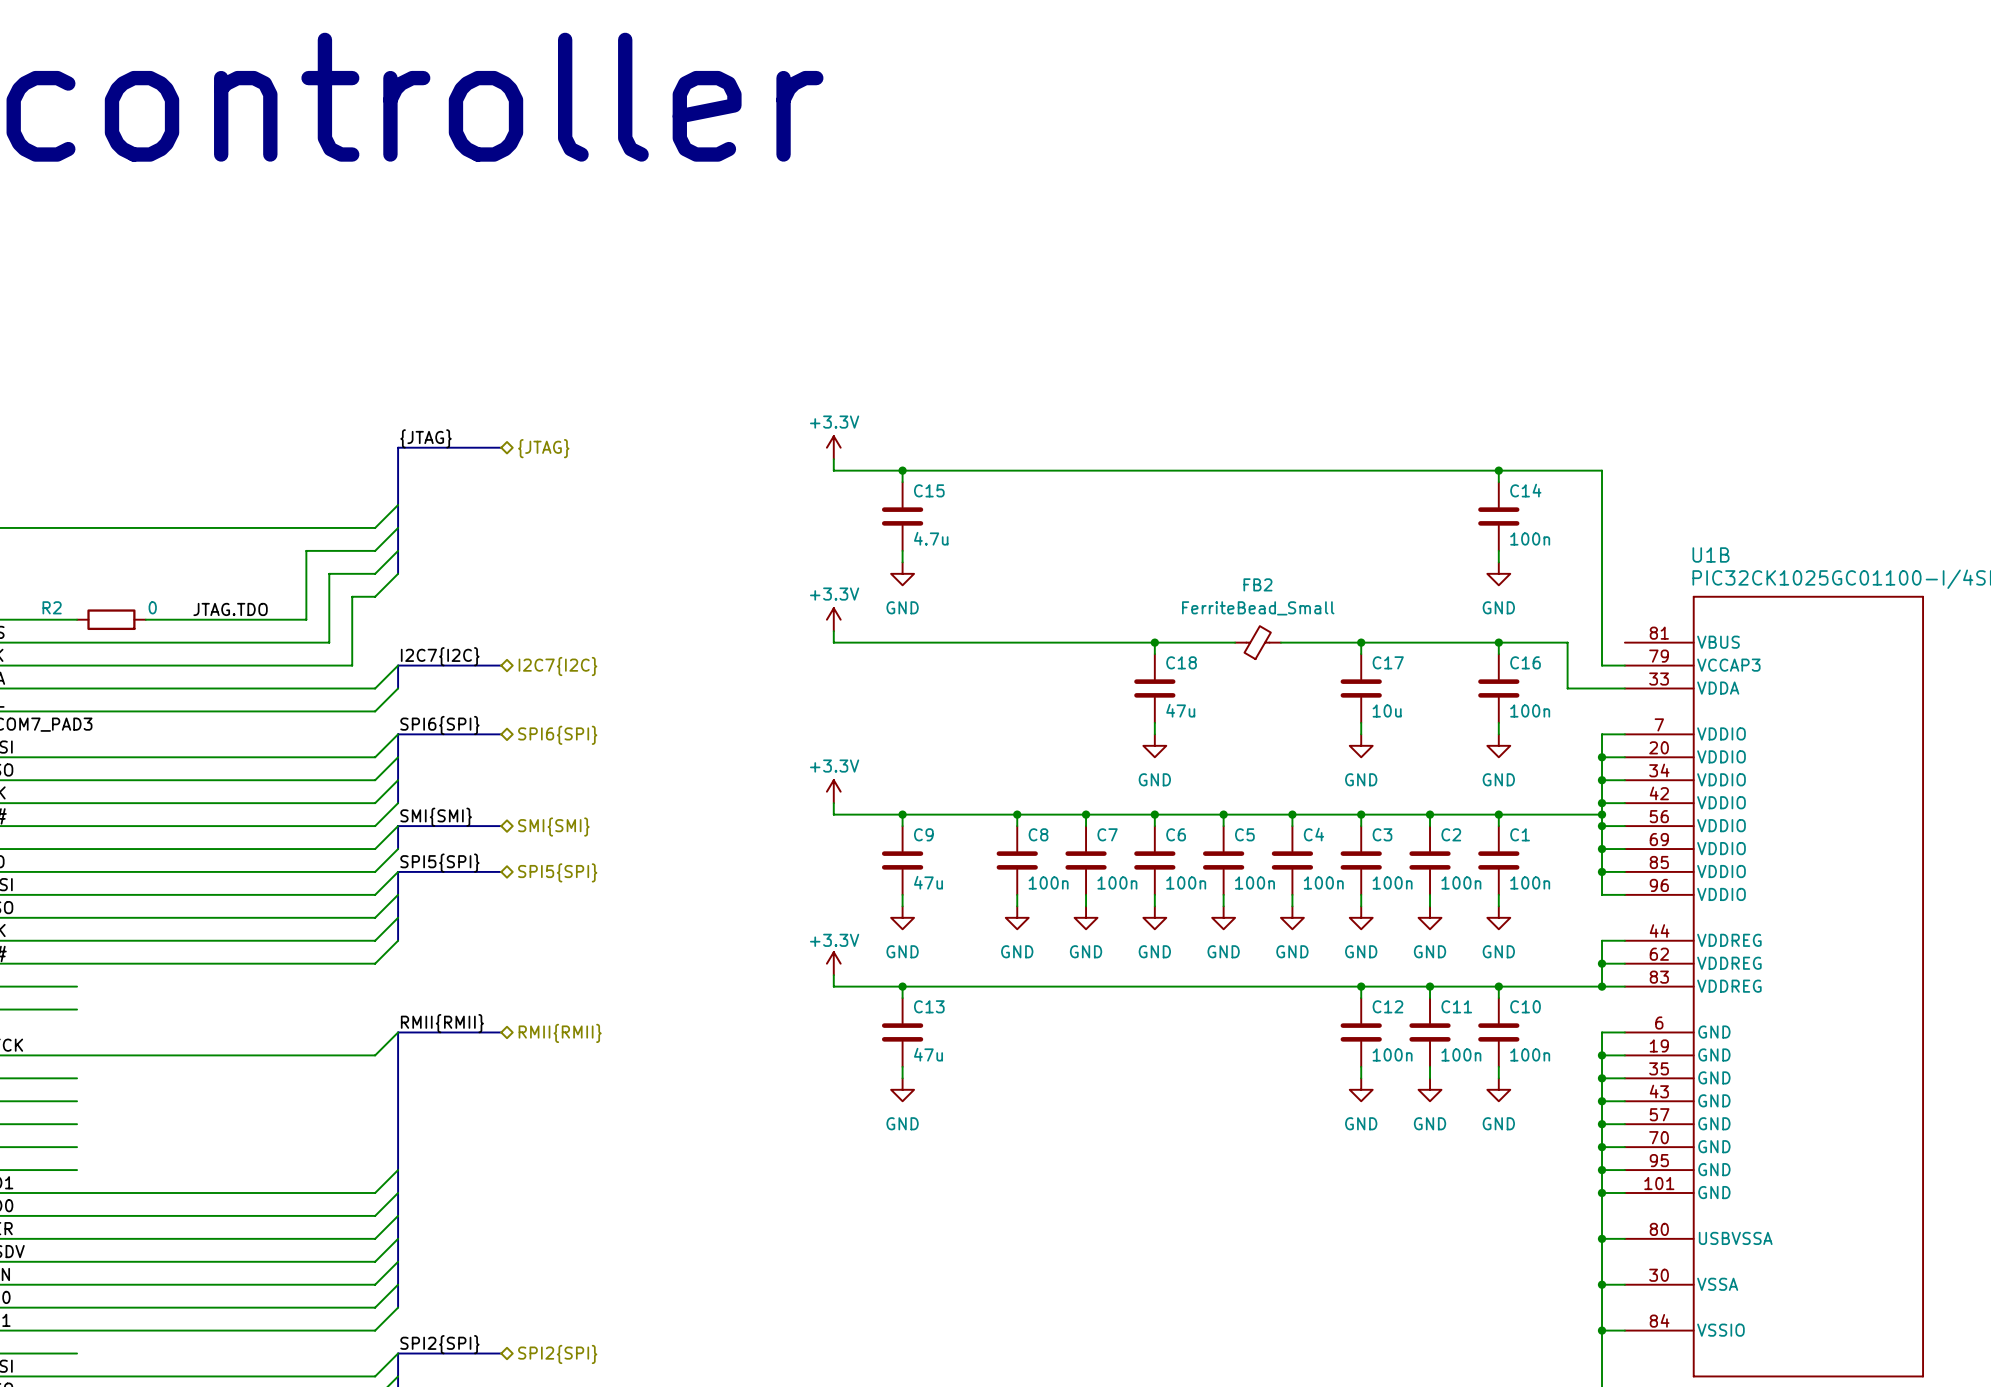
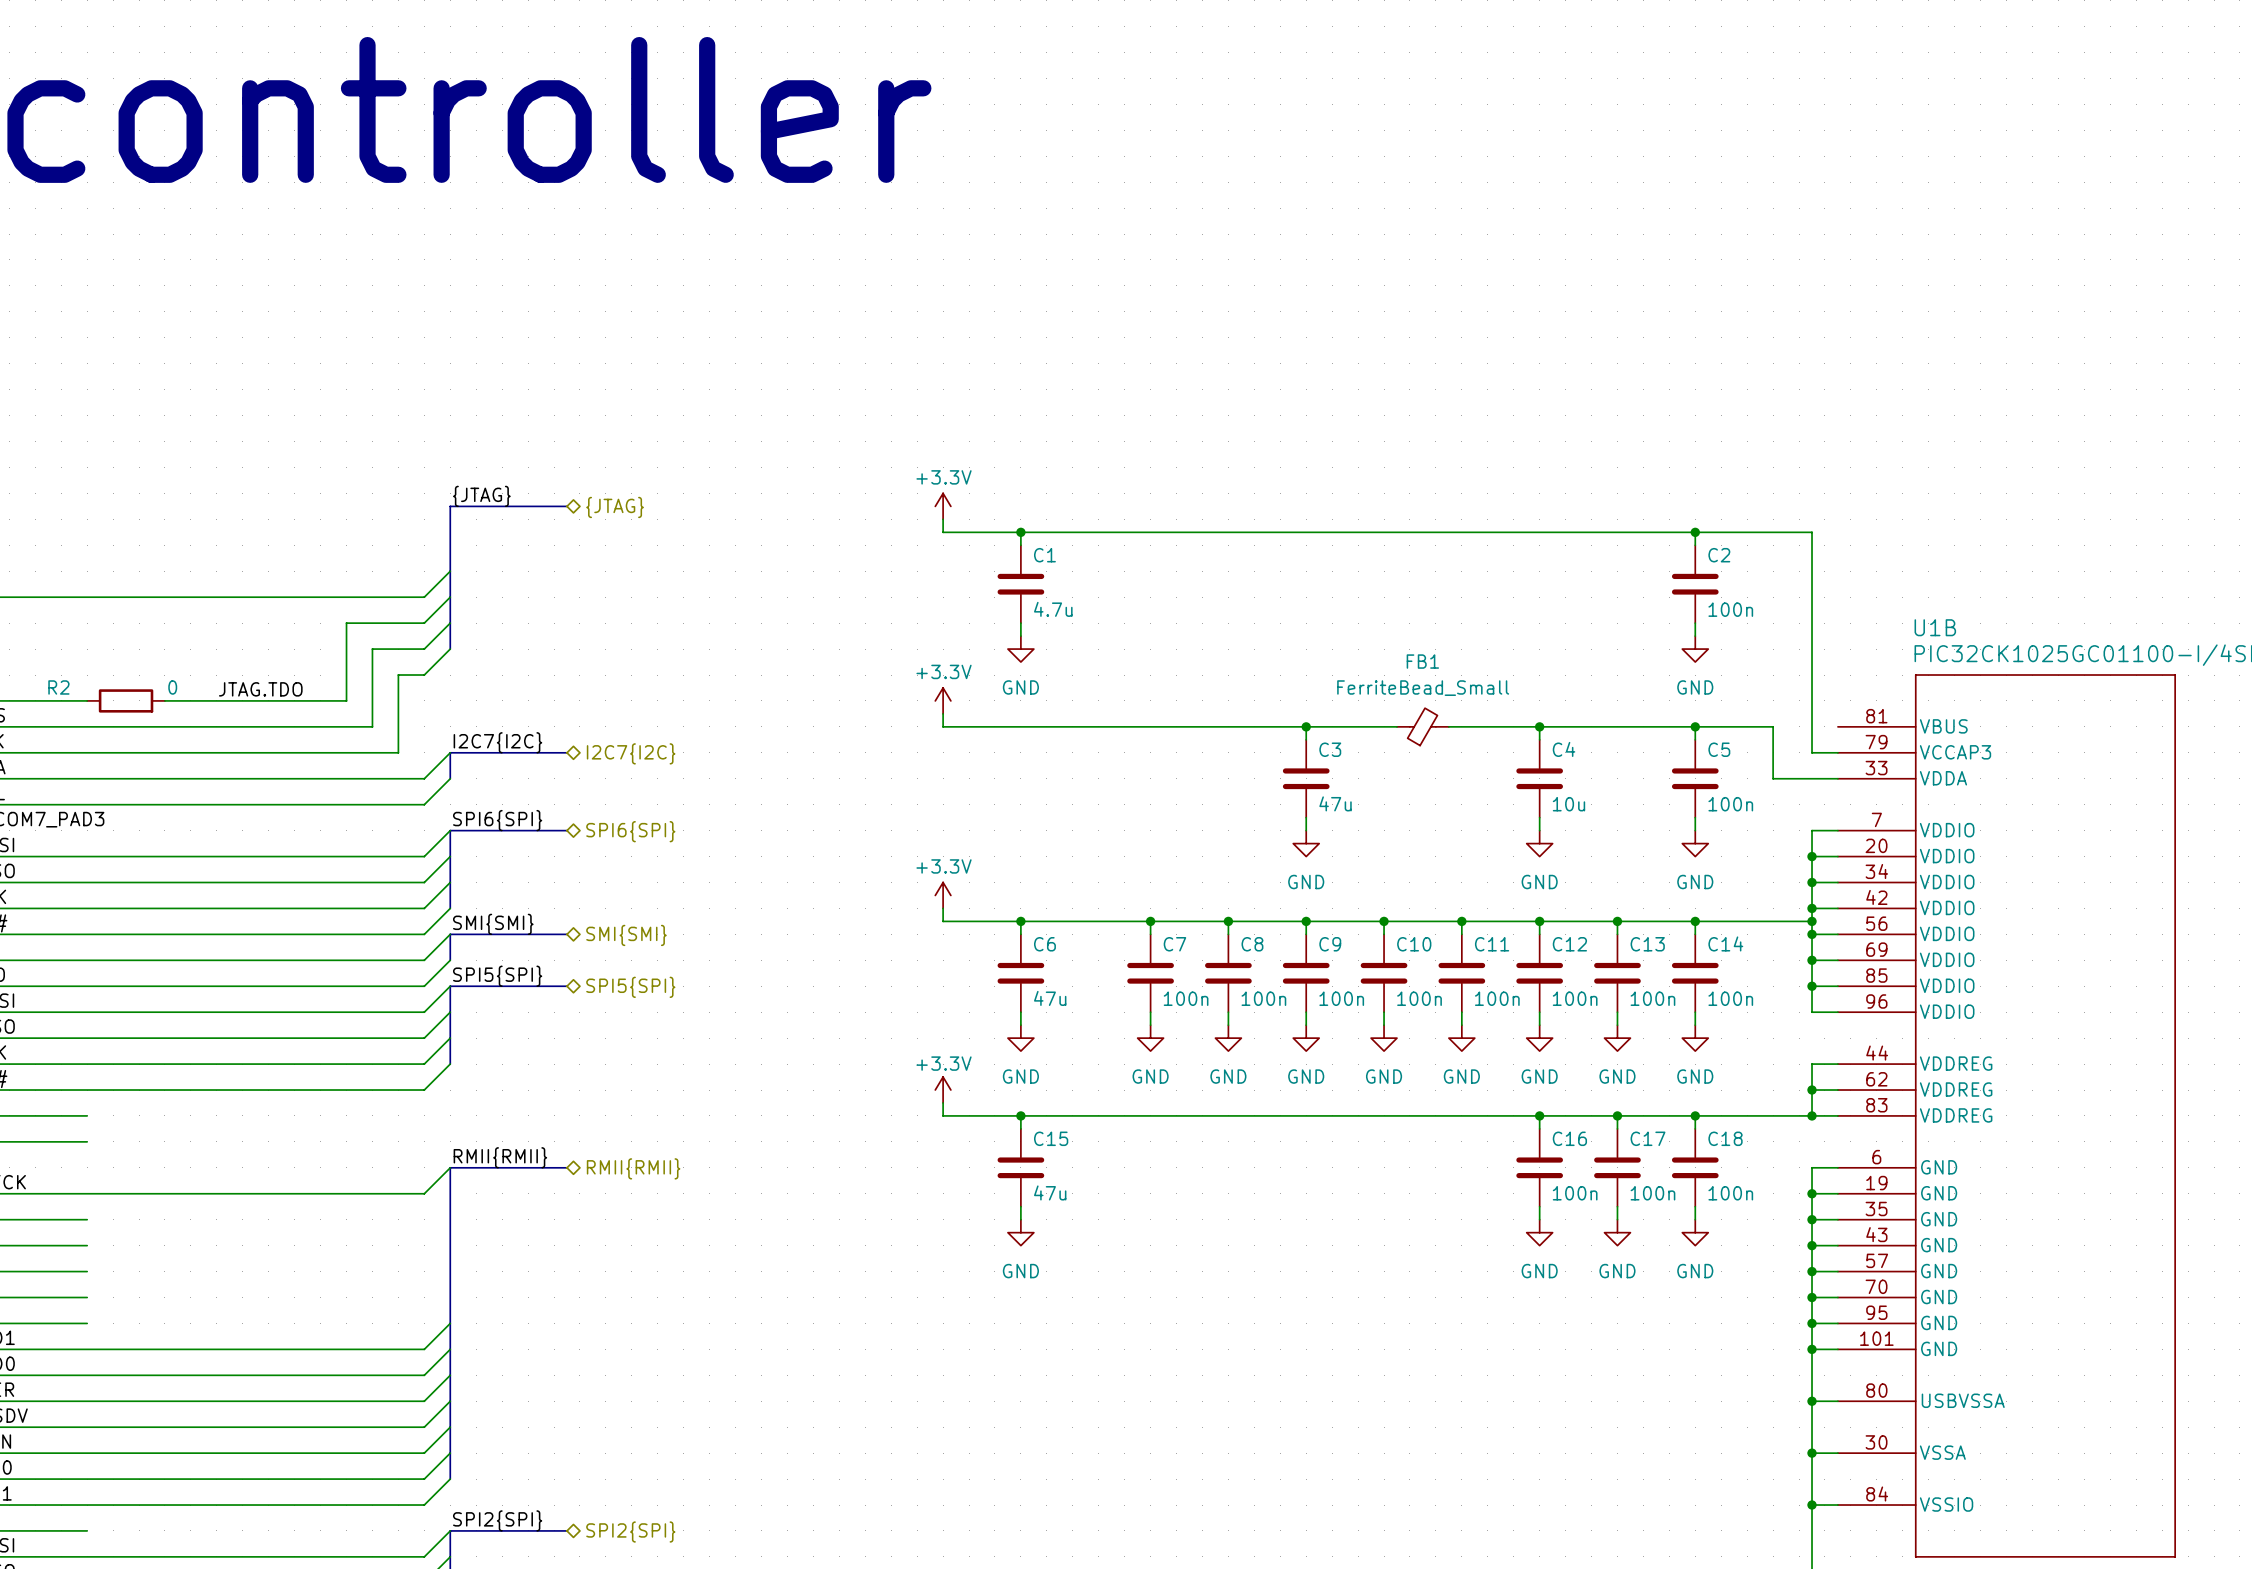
C15 name: C15 (929, 490) -> C1 (1044, 555)
C14 name: C14 (1525, 490) -> C2 (1719, 555)
FB2 name: FB2 (1257, 584) -> FB1 (1422, 661)
C18 name: C18 (1181, 662) -> C3 (1330, 749)
C17 name: C17 (1388, 662) -> C4 (1564, 749)
C16 name: C16 (1525, 662) -> C5 (1719, 749)
C9 name: C9 (923, 834) -> C6 (1044, 944)
C8 name: C8 (1038, 834) -> C7 (1174, 944)
C7 name: C7 (1107, 834) -> C8 (1252, 944)
C6 name: C6 (1176, 834) -> C9 (1330, 944)
C5 name: C5 (1244, 834) -> C10 (1414, 944)
C4 name: C4 (1313, 834) -> C11 (1492, 944)
C3 name: C3 (1382, 834) -> C12 (1569, 944)
C2 name: C2 (1451, 834) -> C13 (1647, 944)
C1 name: C1 (1520, 834) -> C14 (1725, 943)
C13 name: C13 (929, 1006) -> C15 (1051, 1138)
C12 name: C12 (1387, 1006) -> C16 (1569, 1138)
C11 name: C11 (1456, 1006) -> C17 (1648, 1138)
C10 name: C10 (1525, 1006) -> C18 (1725, 1138)

